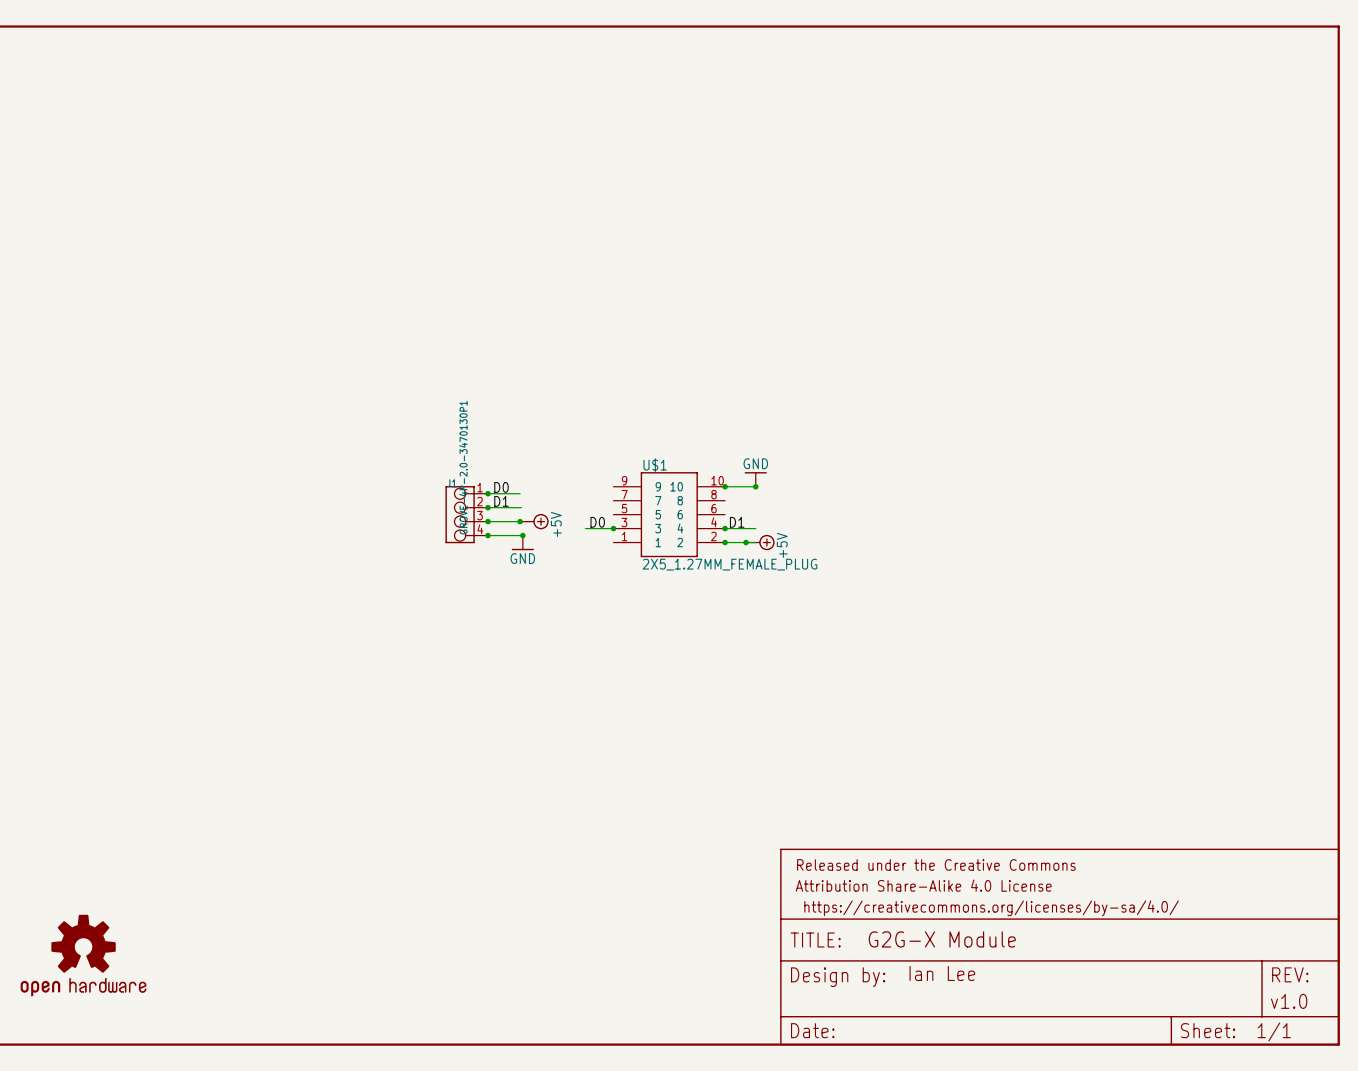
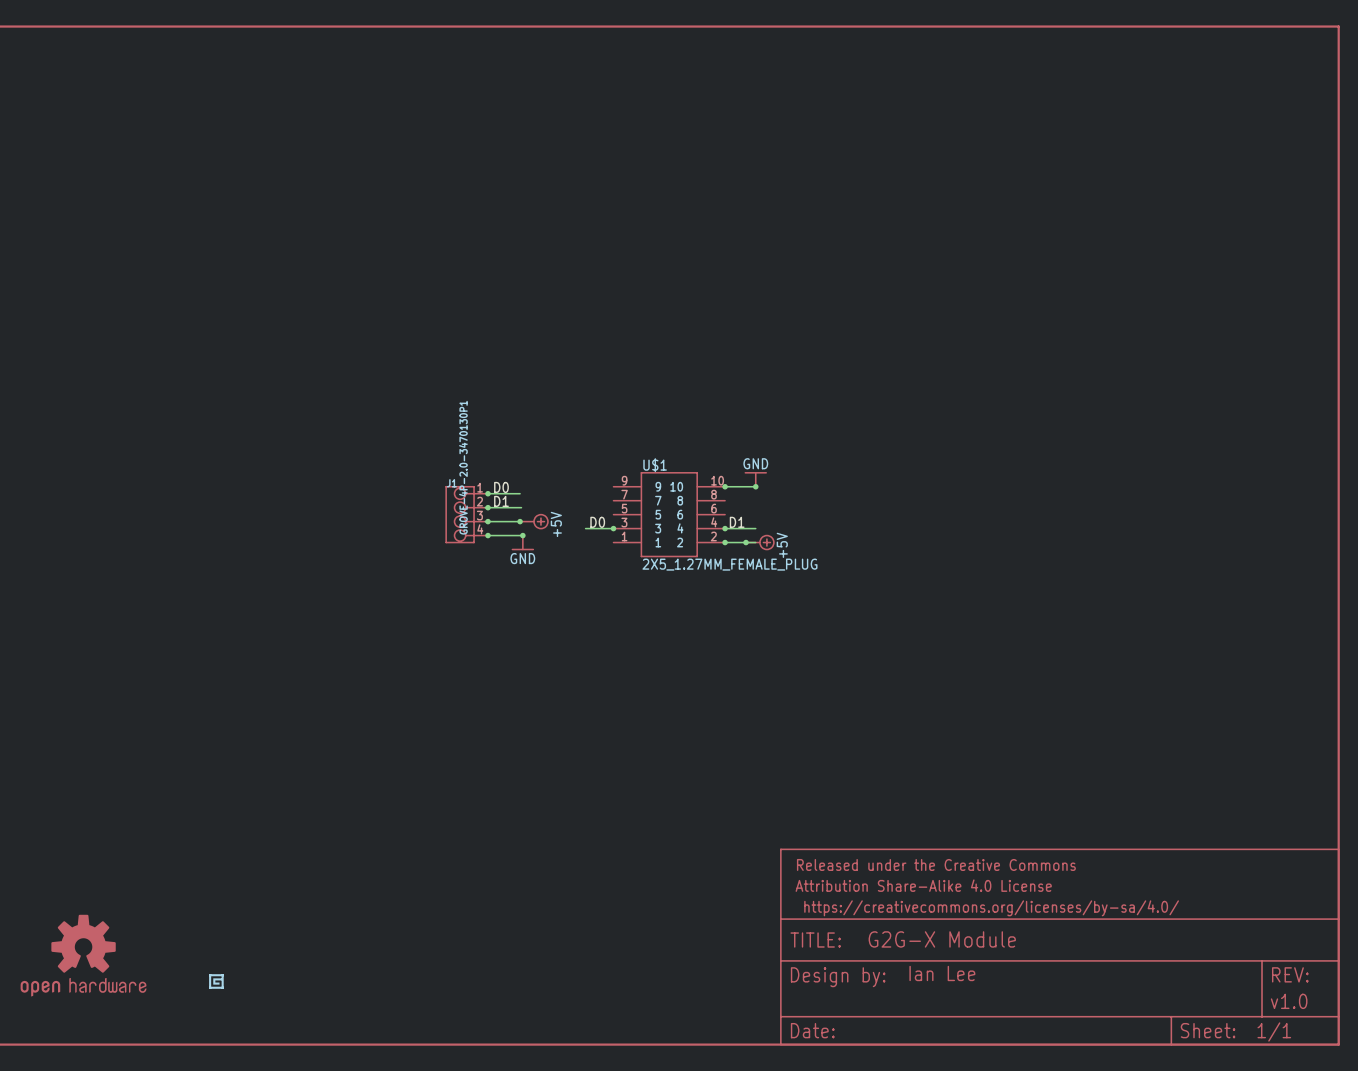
part: none -> (216, 981)

